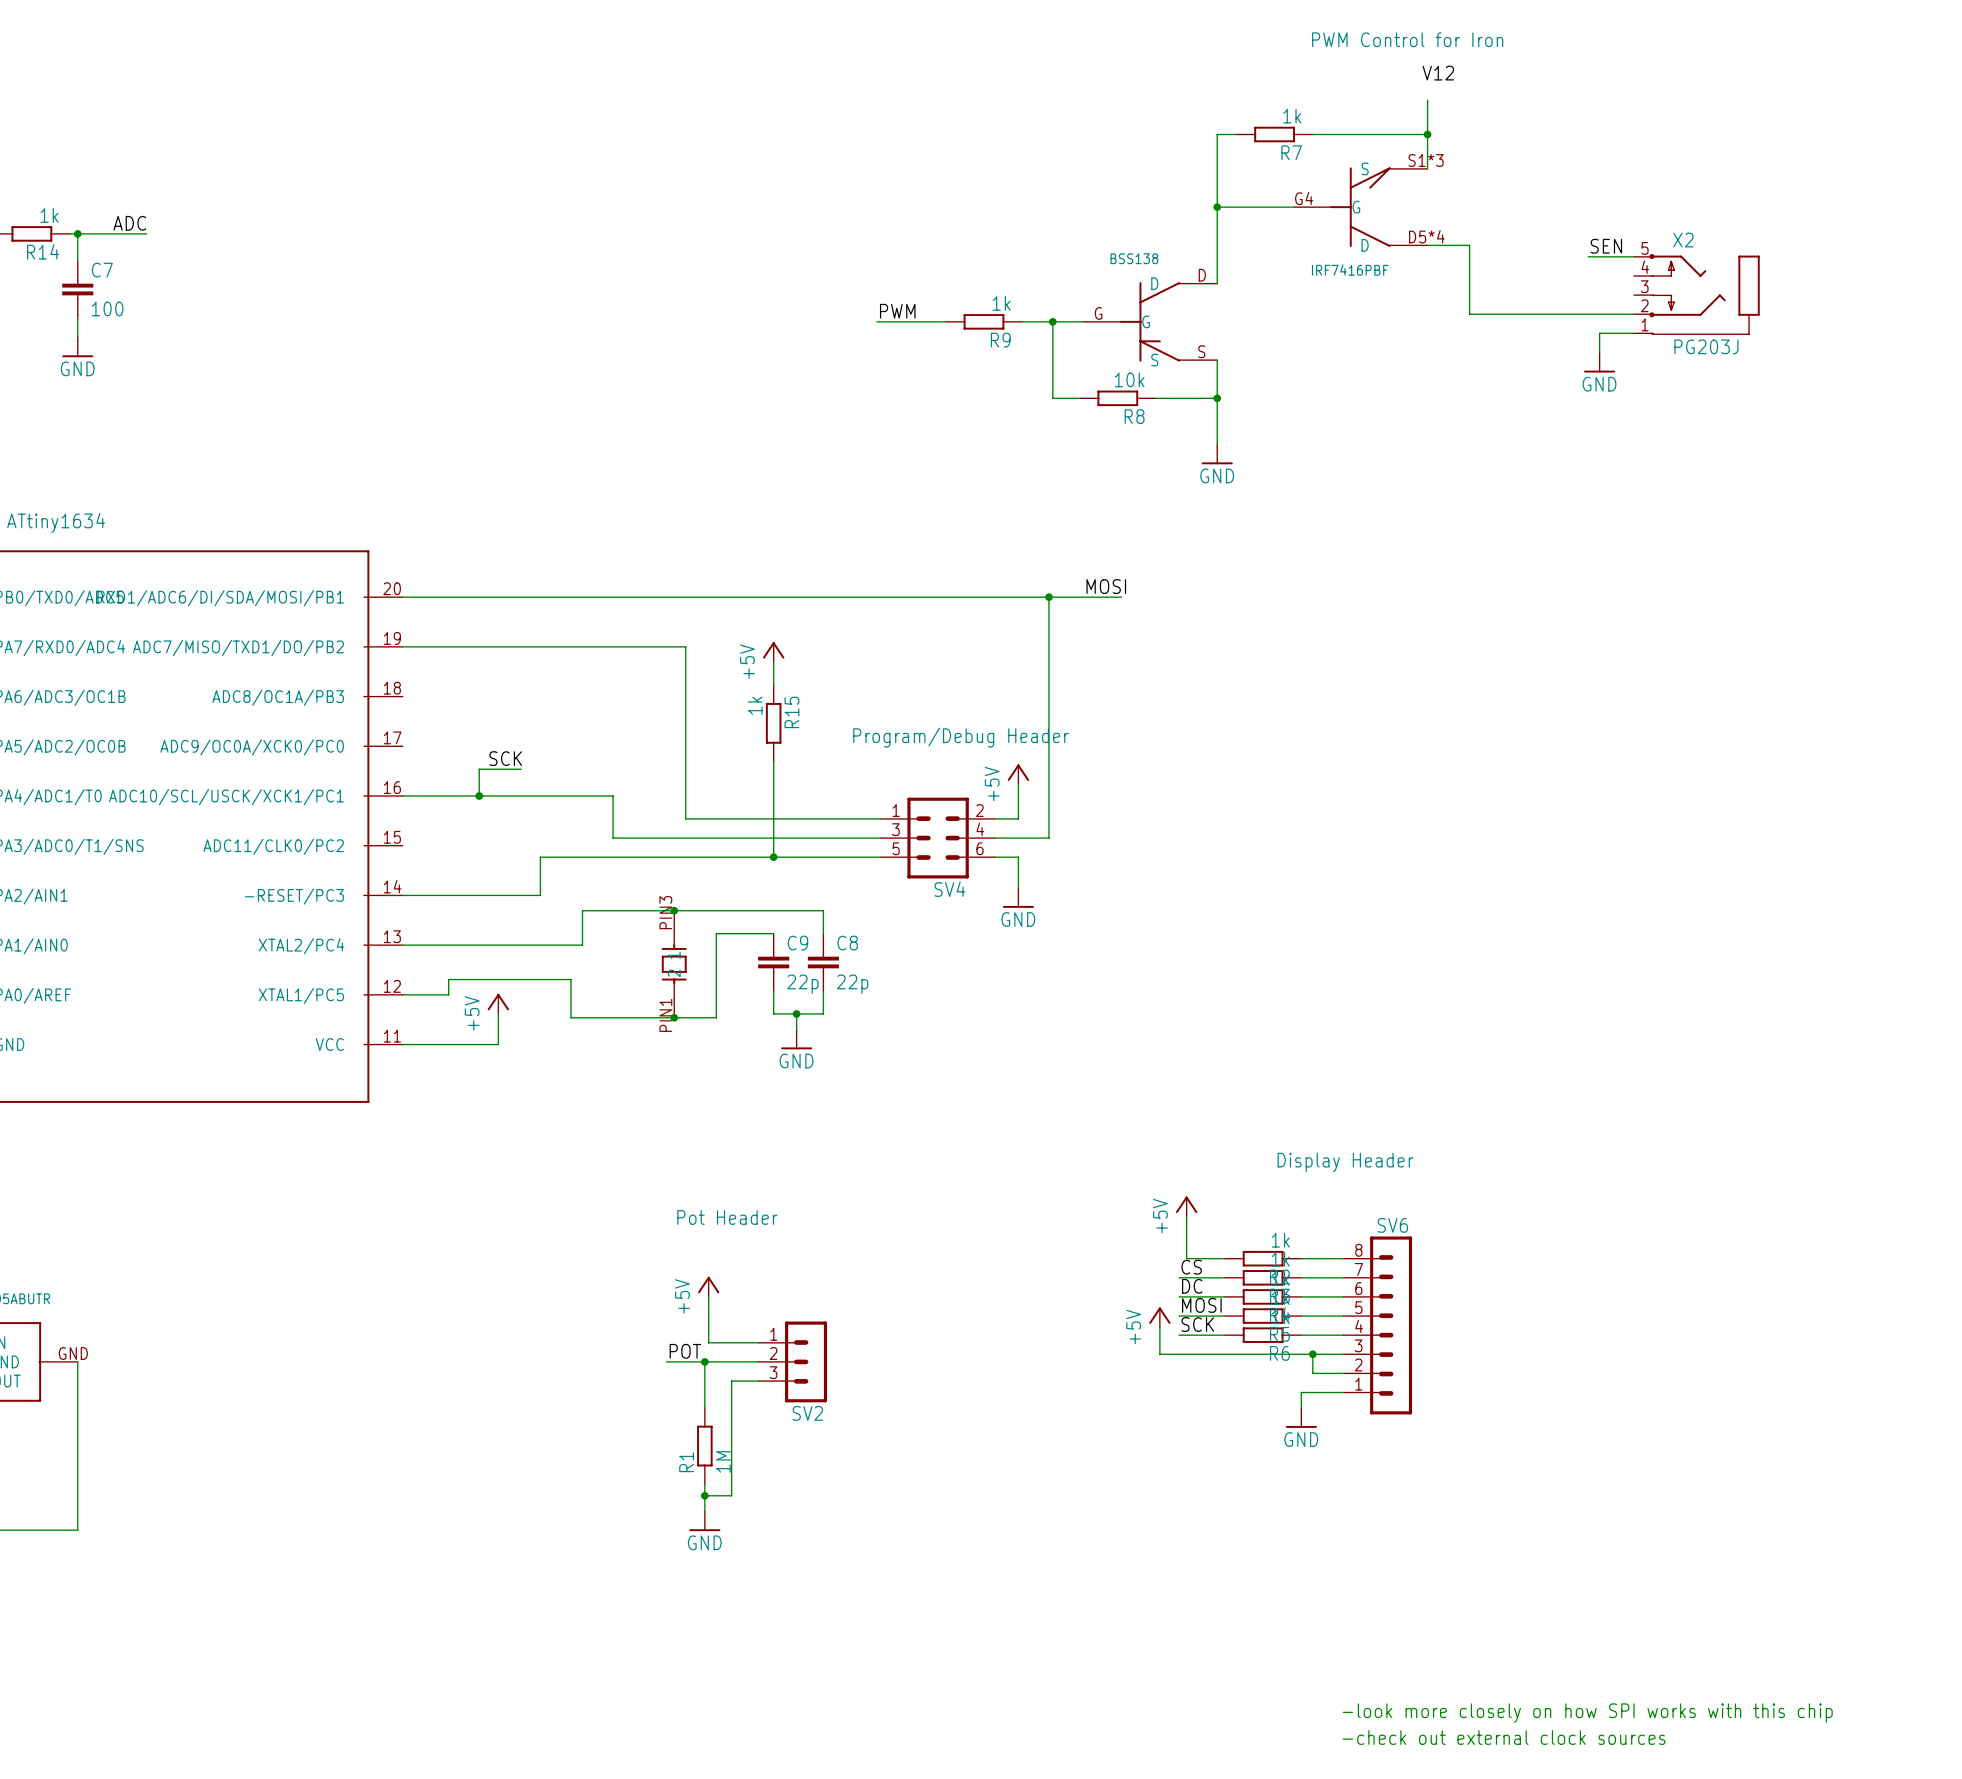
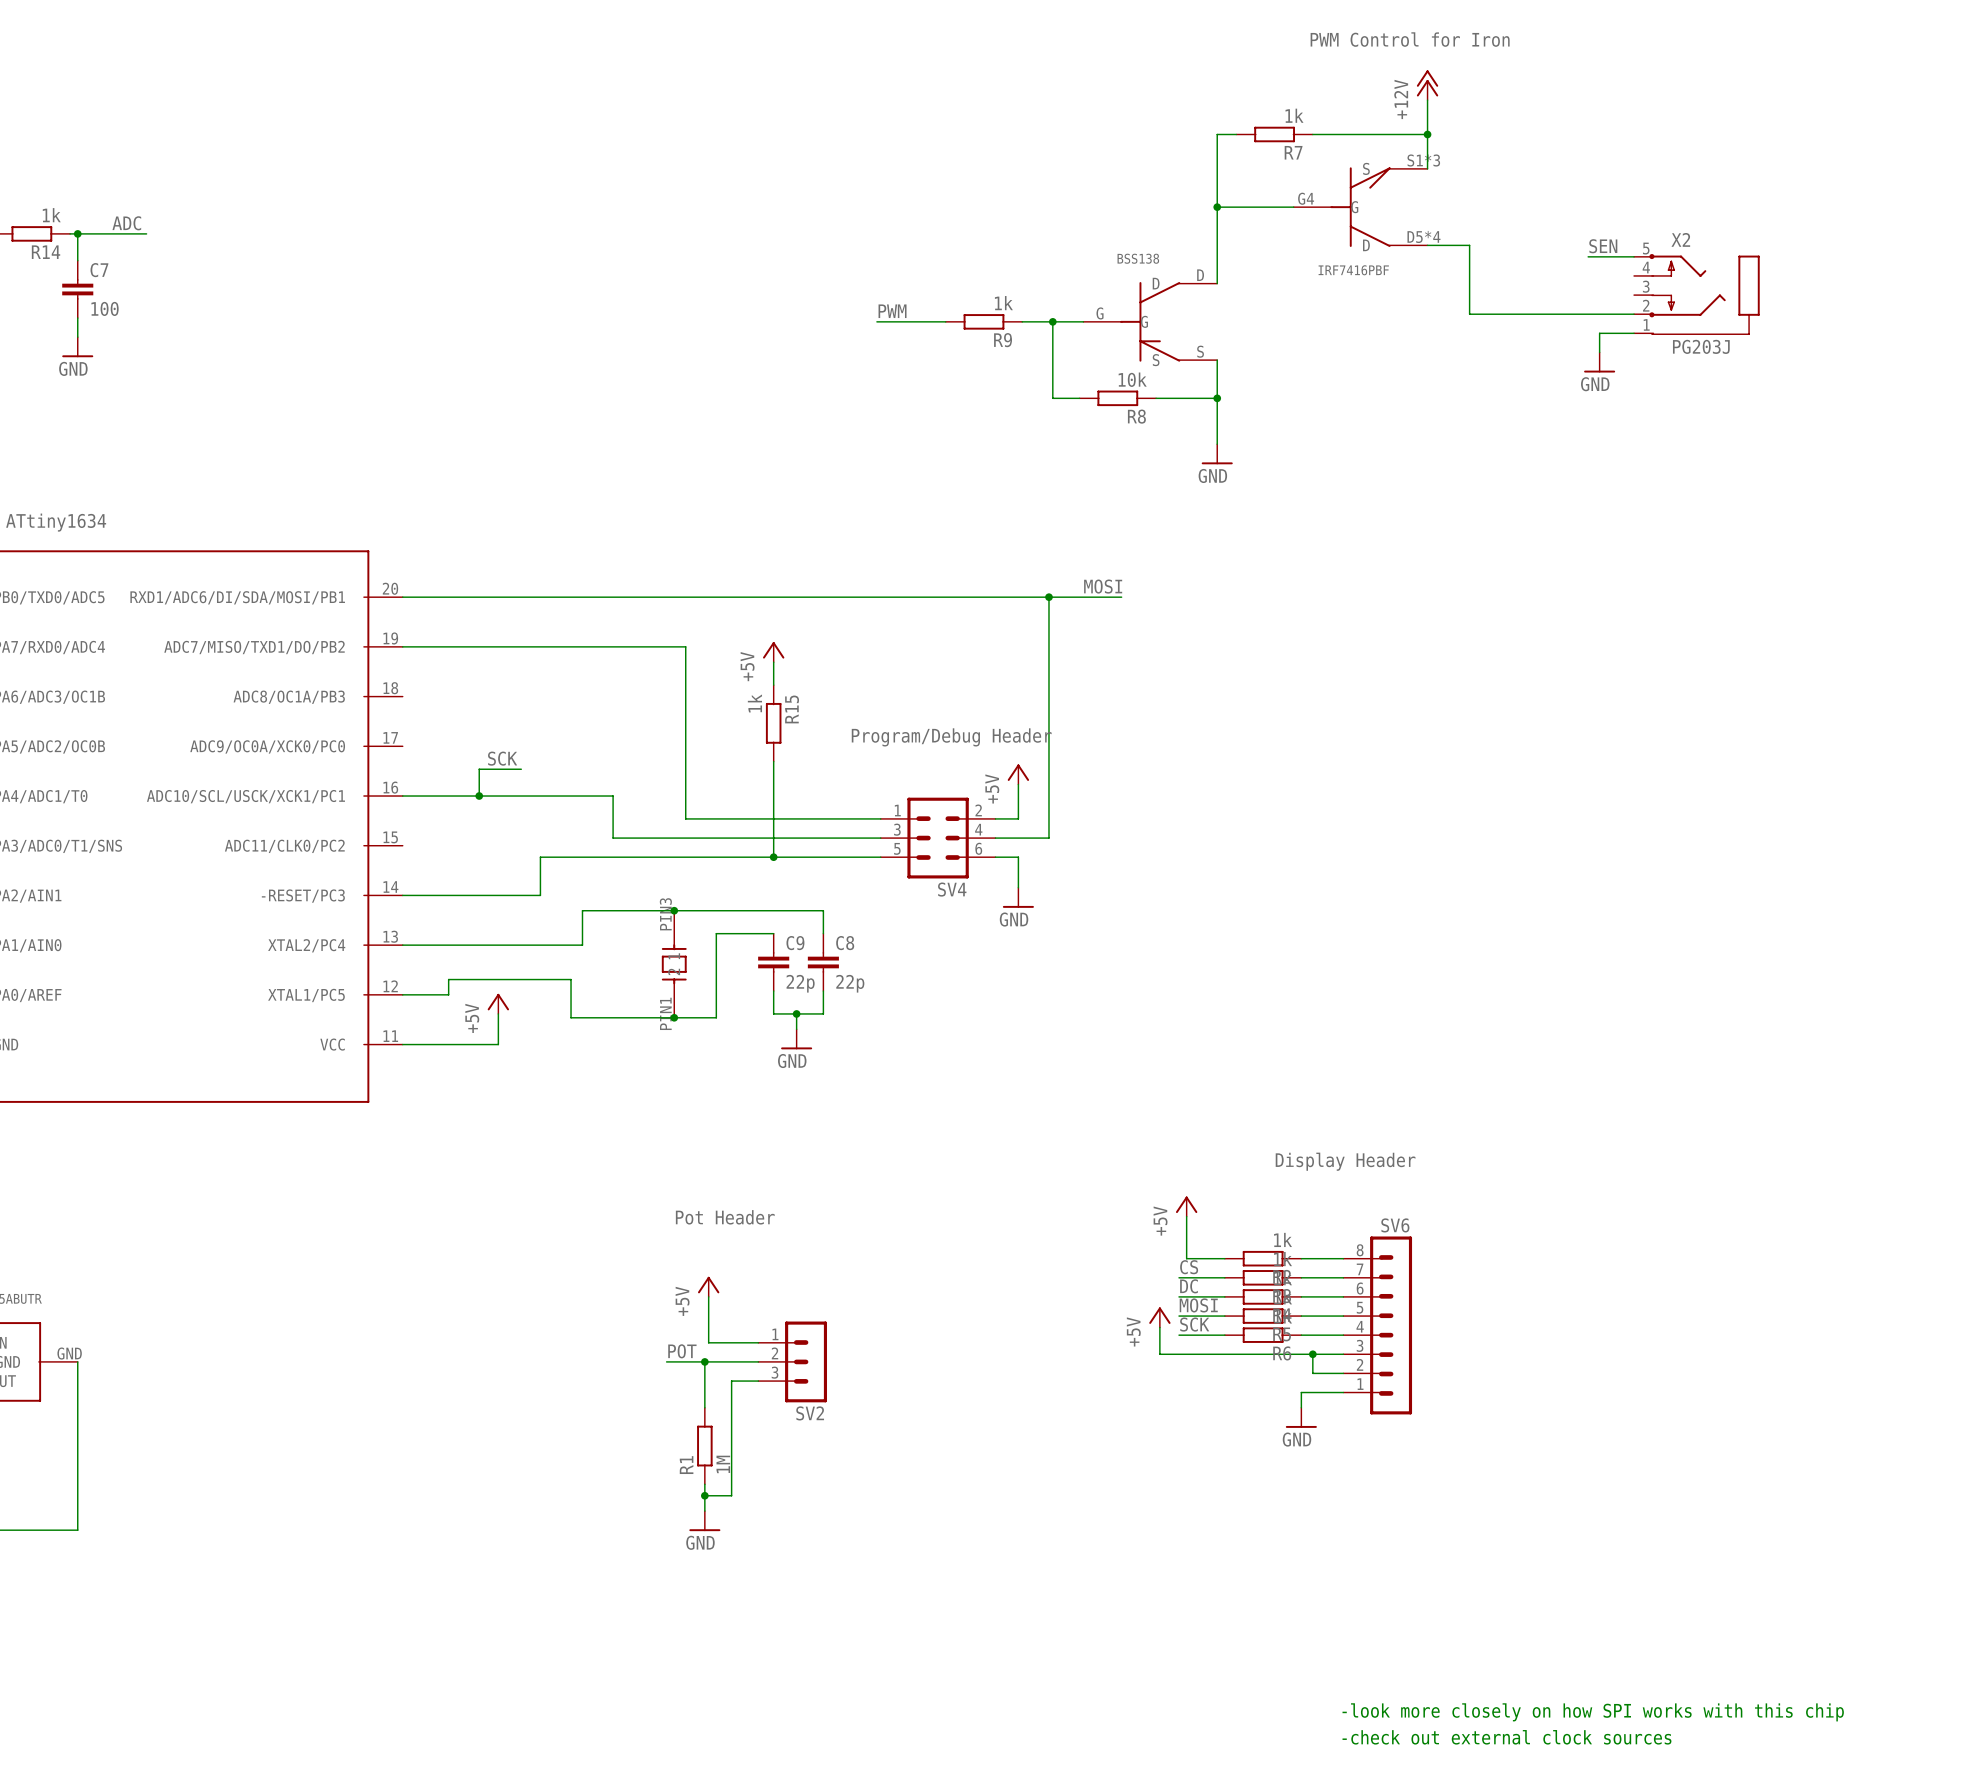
label: V12 (1438, 73) -> none
power symbol: none -> +12V (1427, 85)

